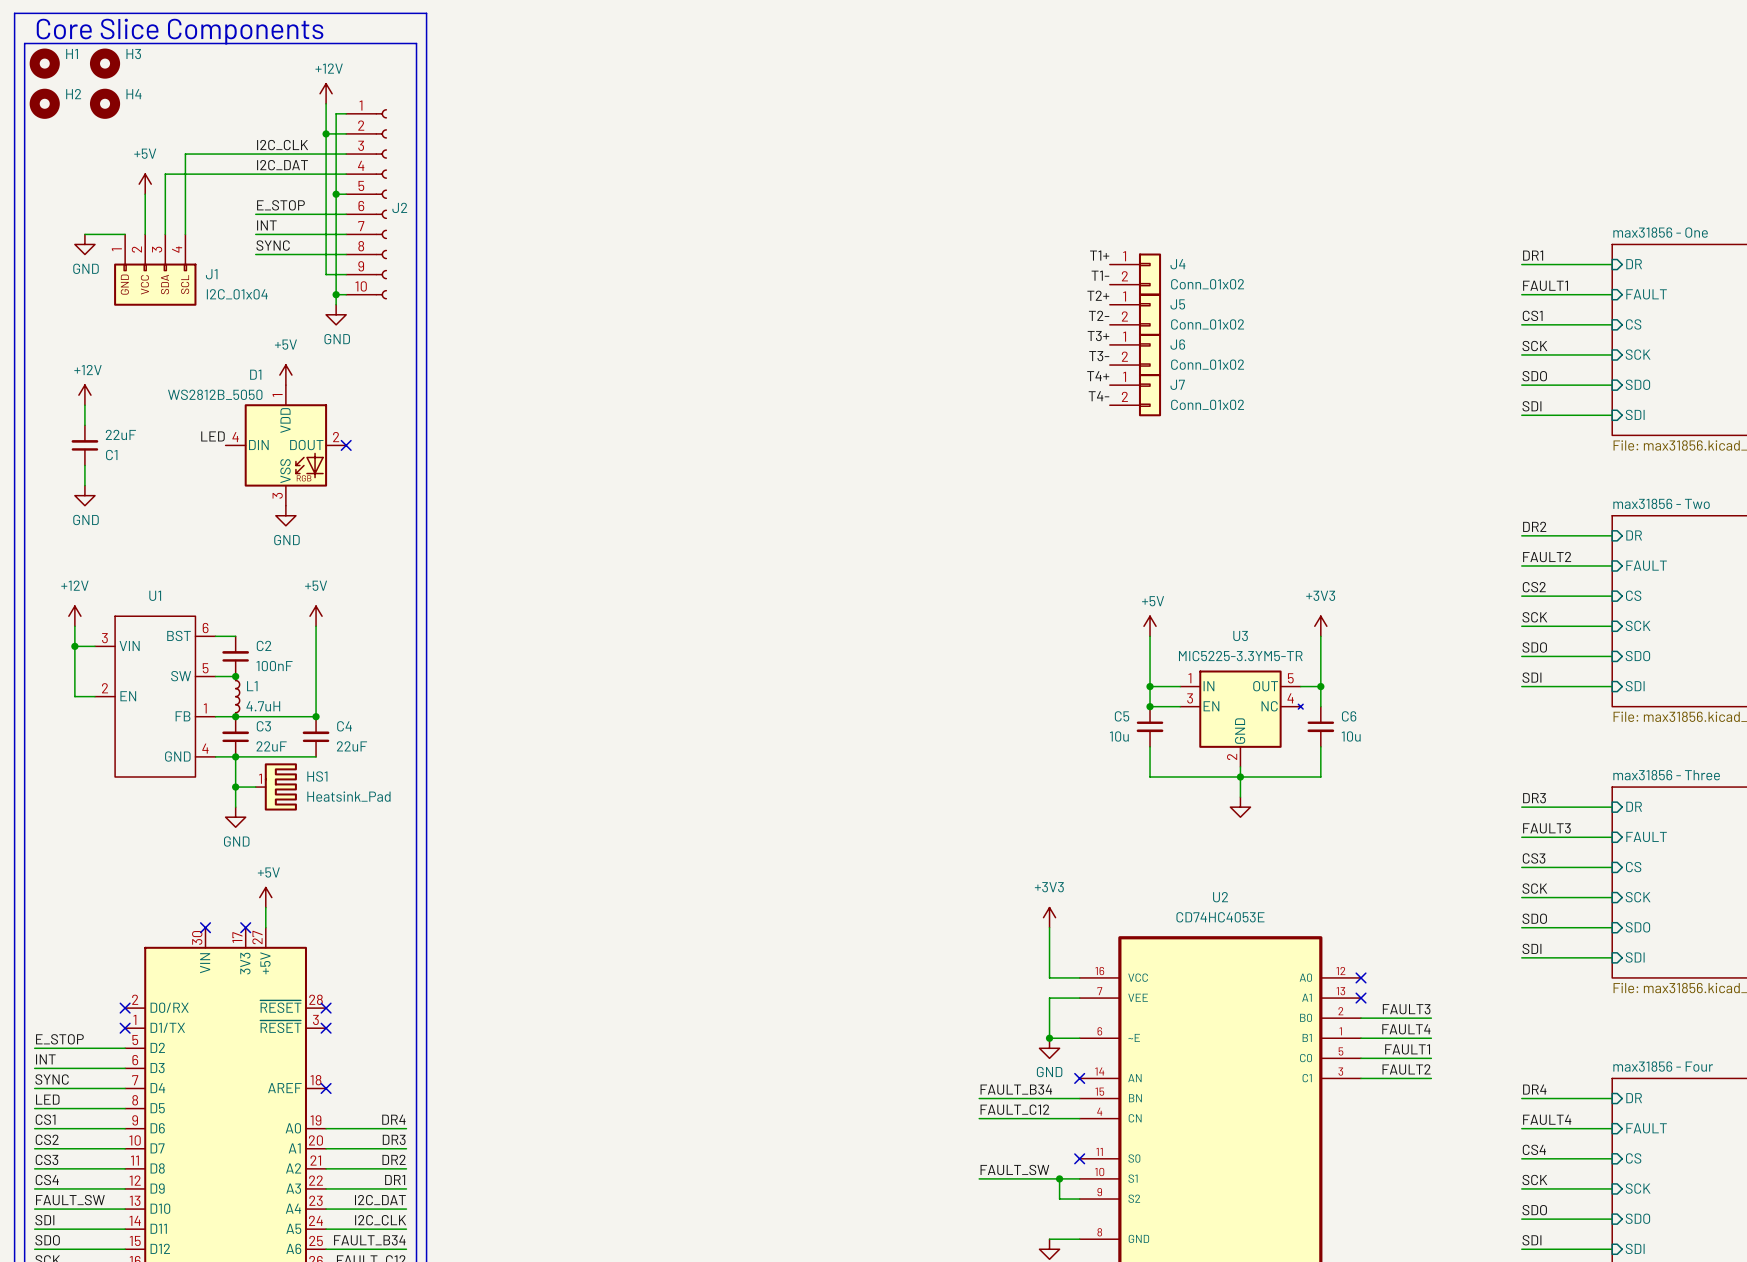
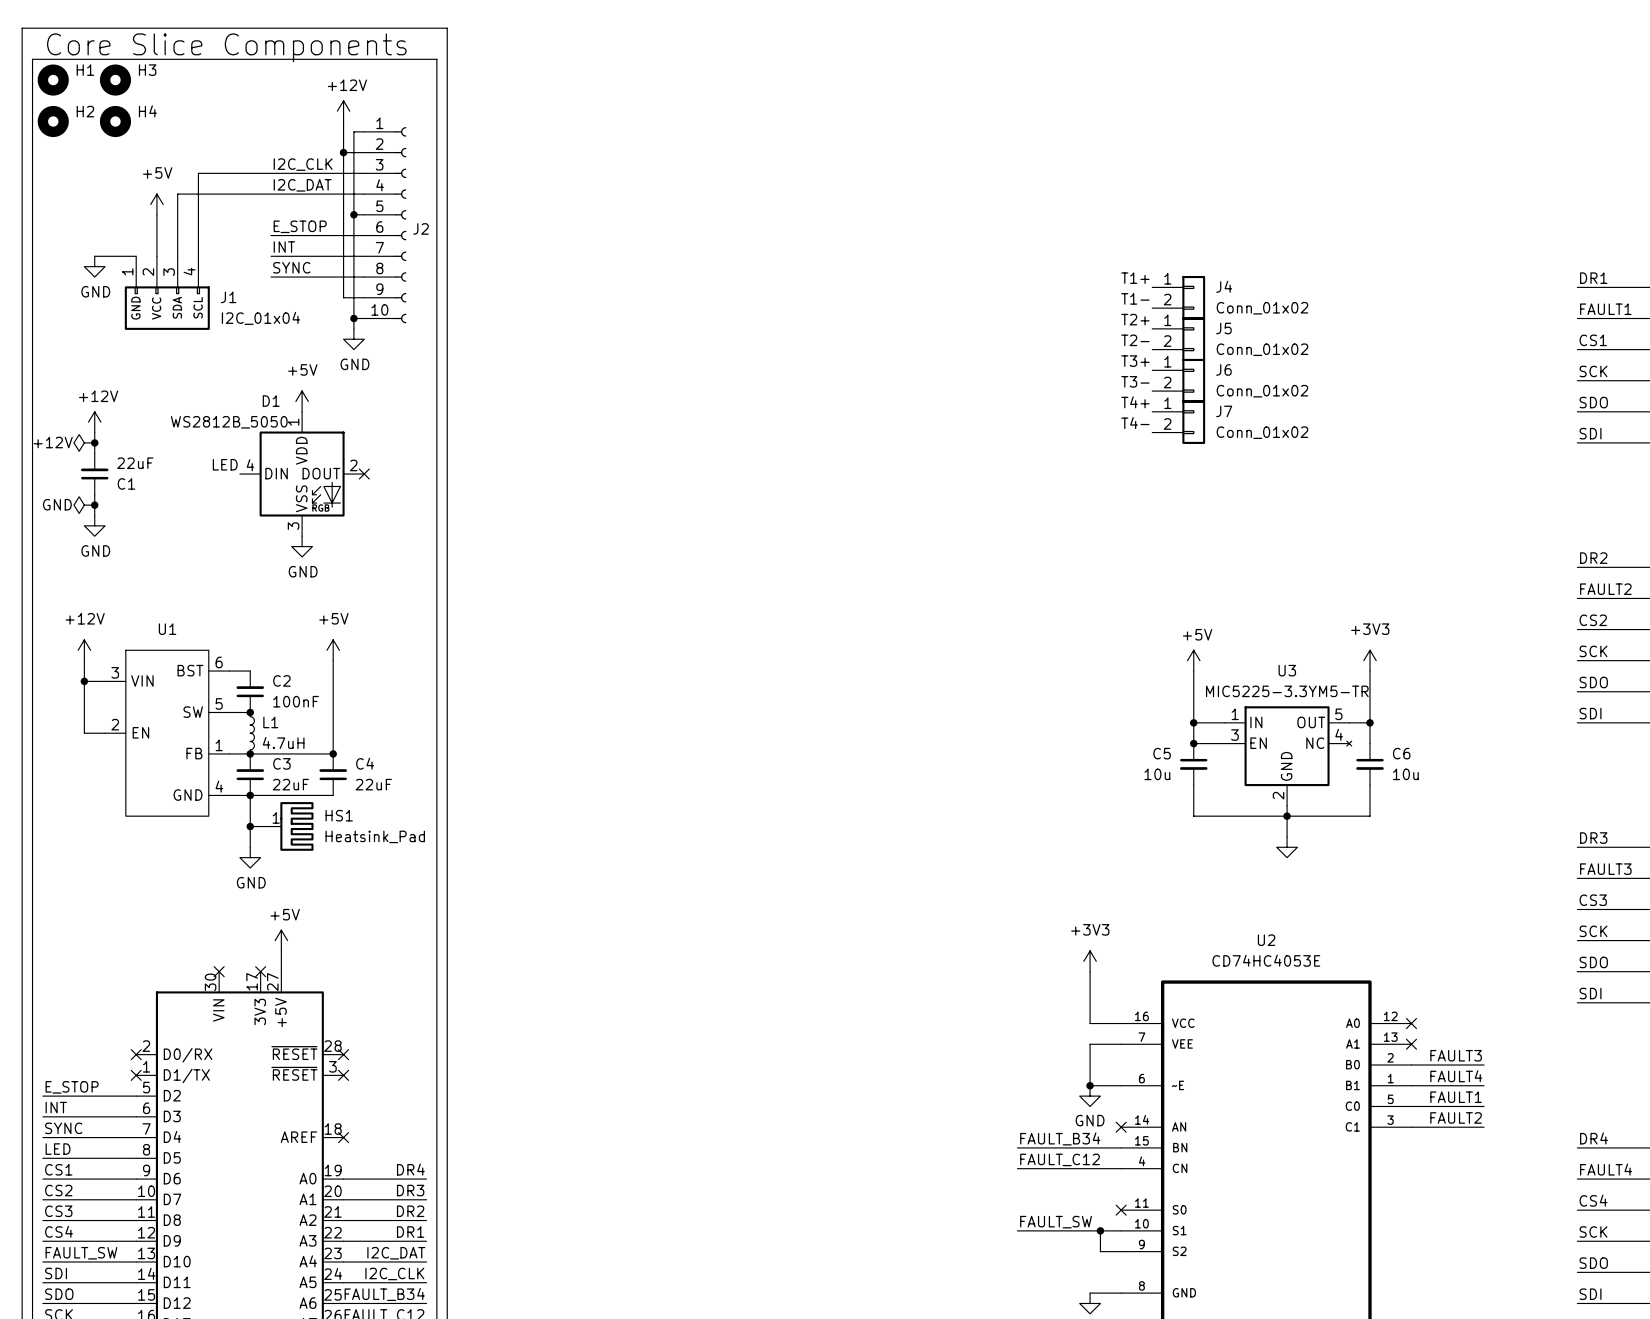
power symbol: none -> +12V (84, 442)
junction: none -> (94, 442)
power symbol: none -> GND (84, 505)
junction: none -> (94, 505)

